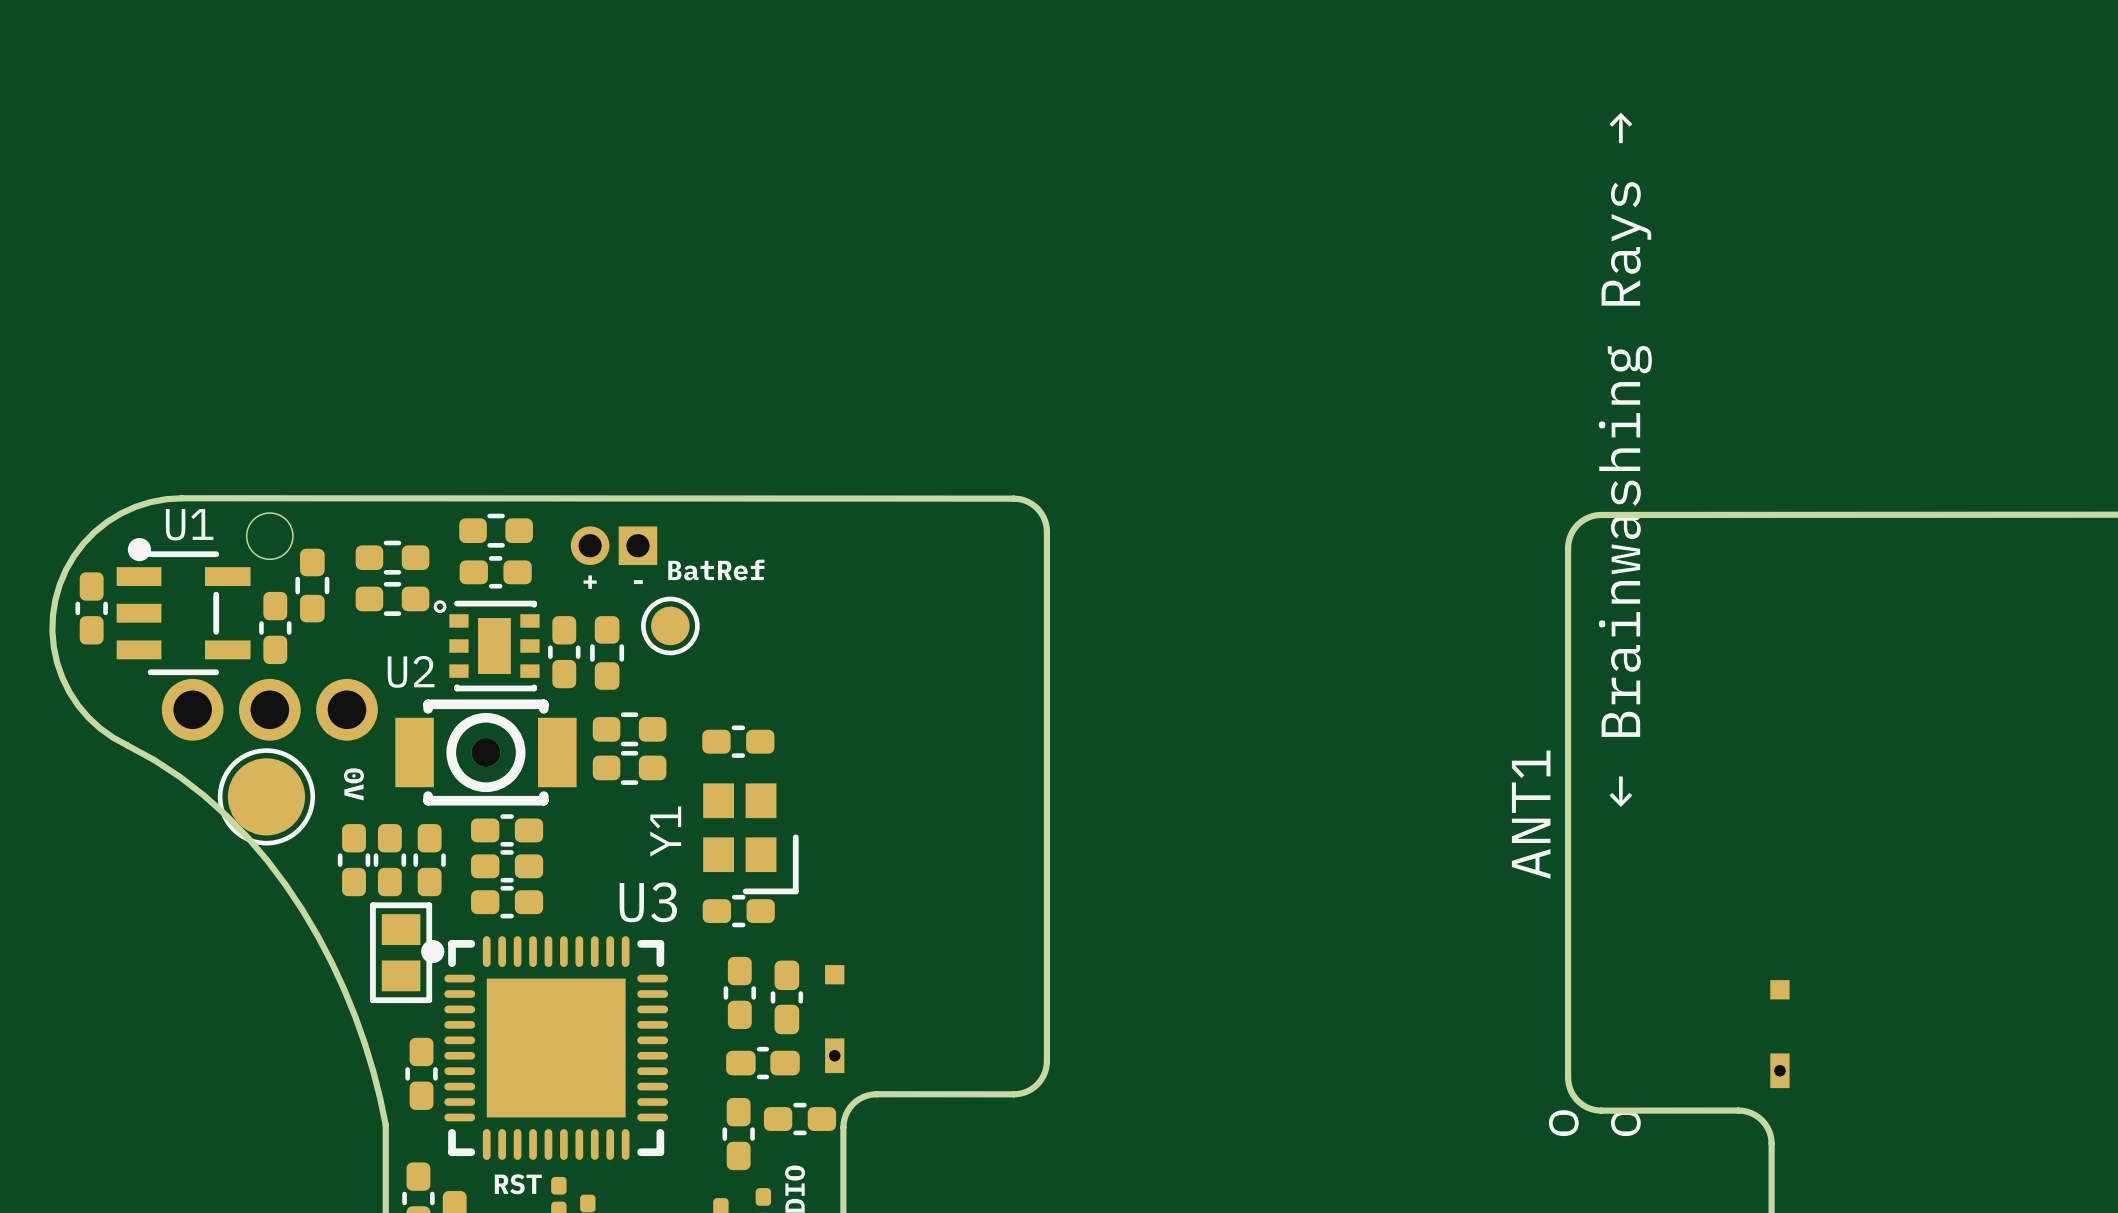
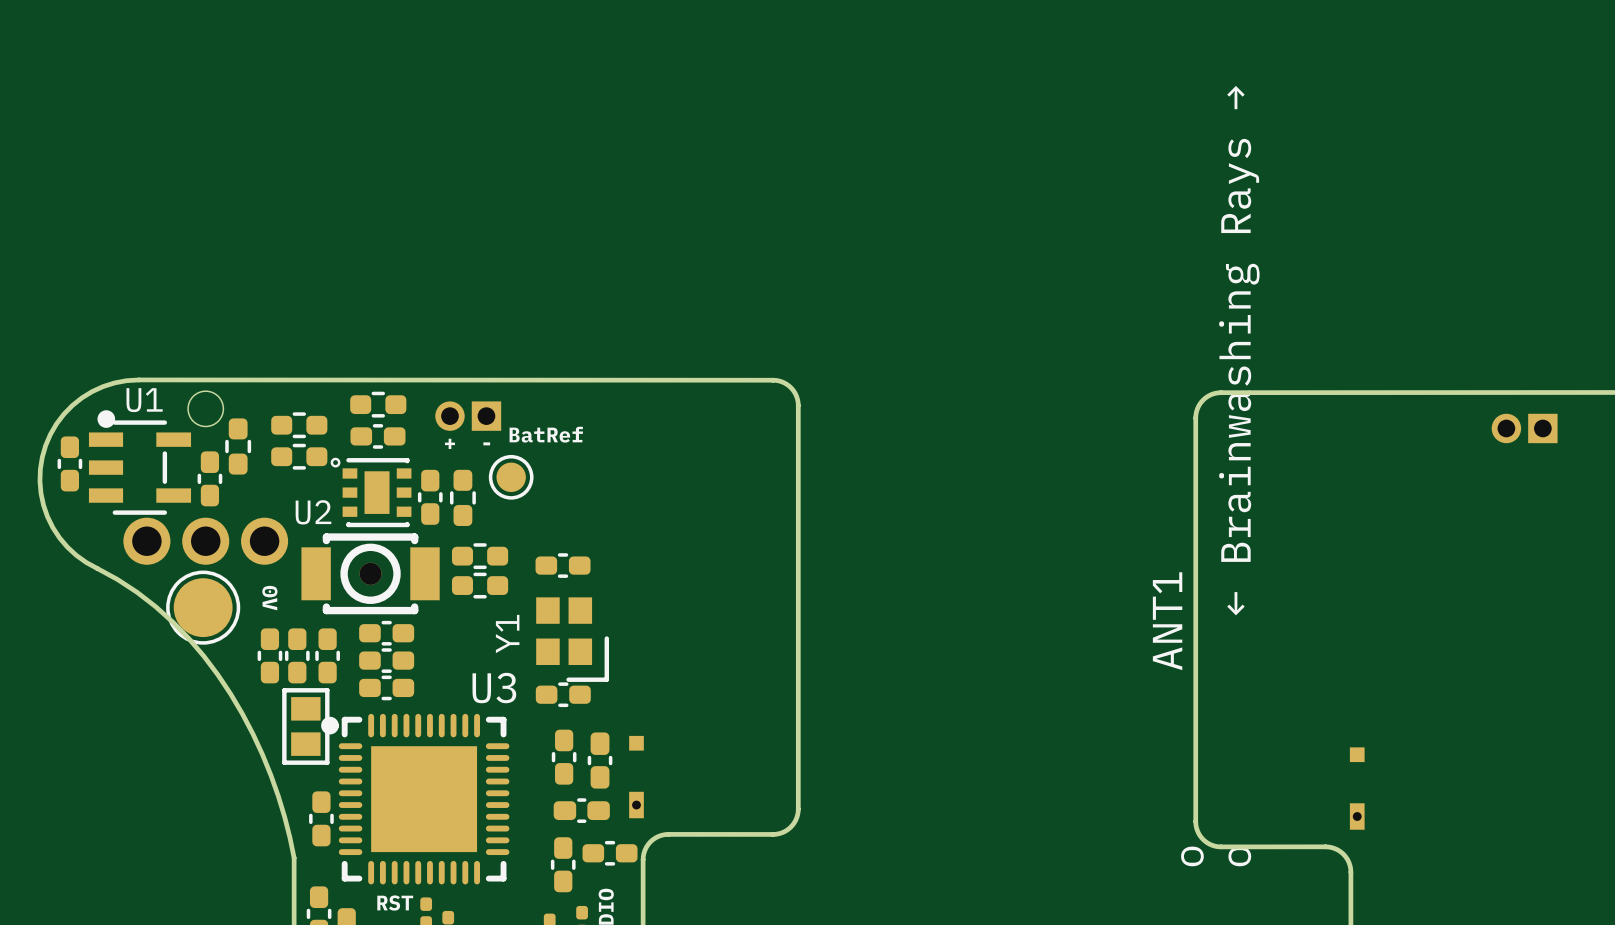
part: none -> (1524, 428)

